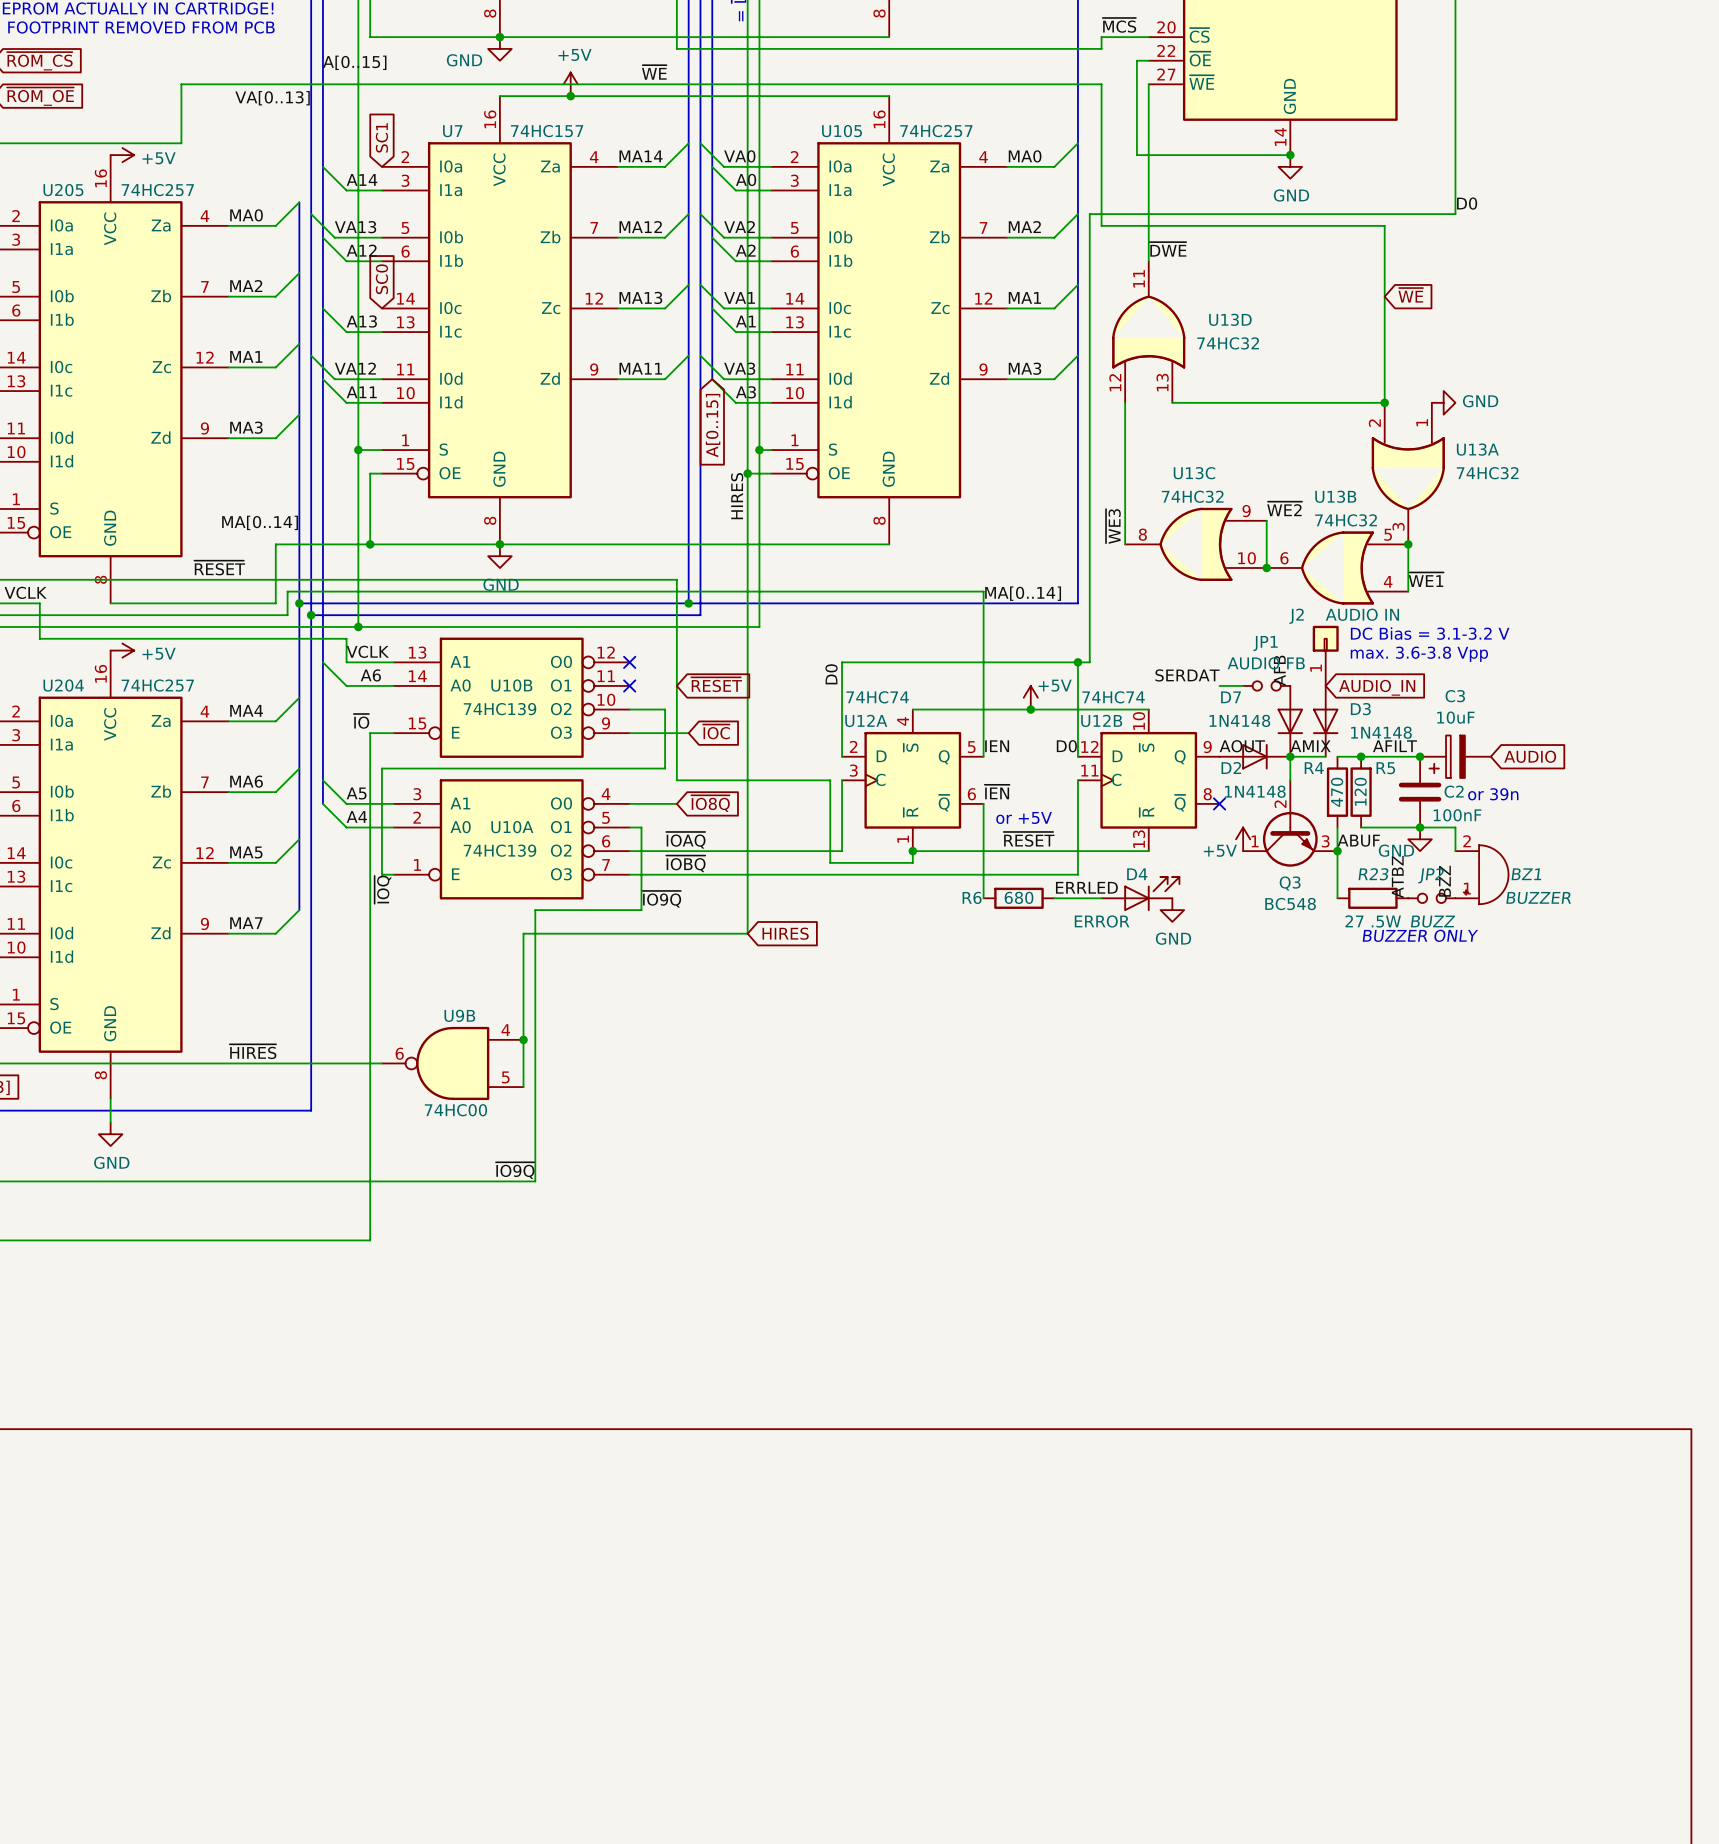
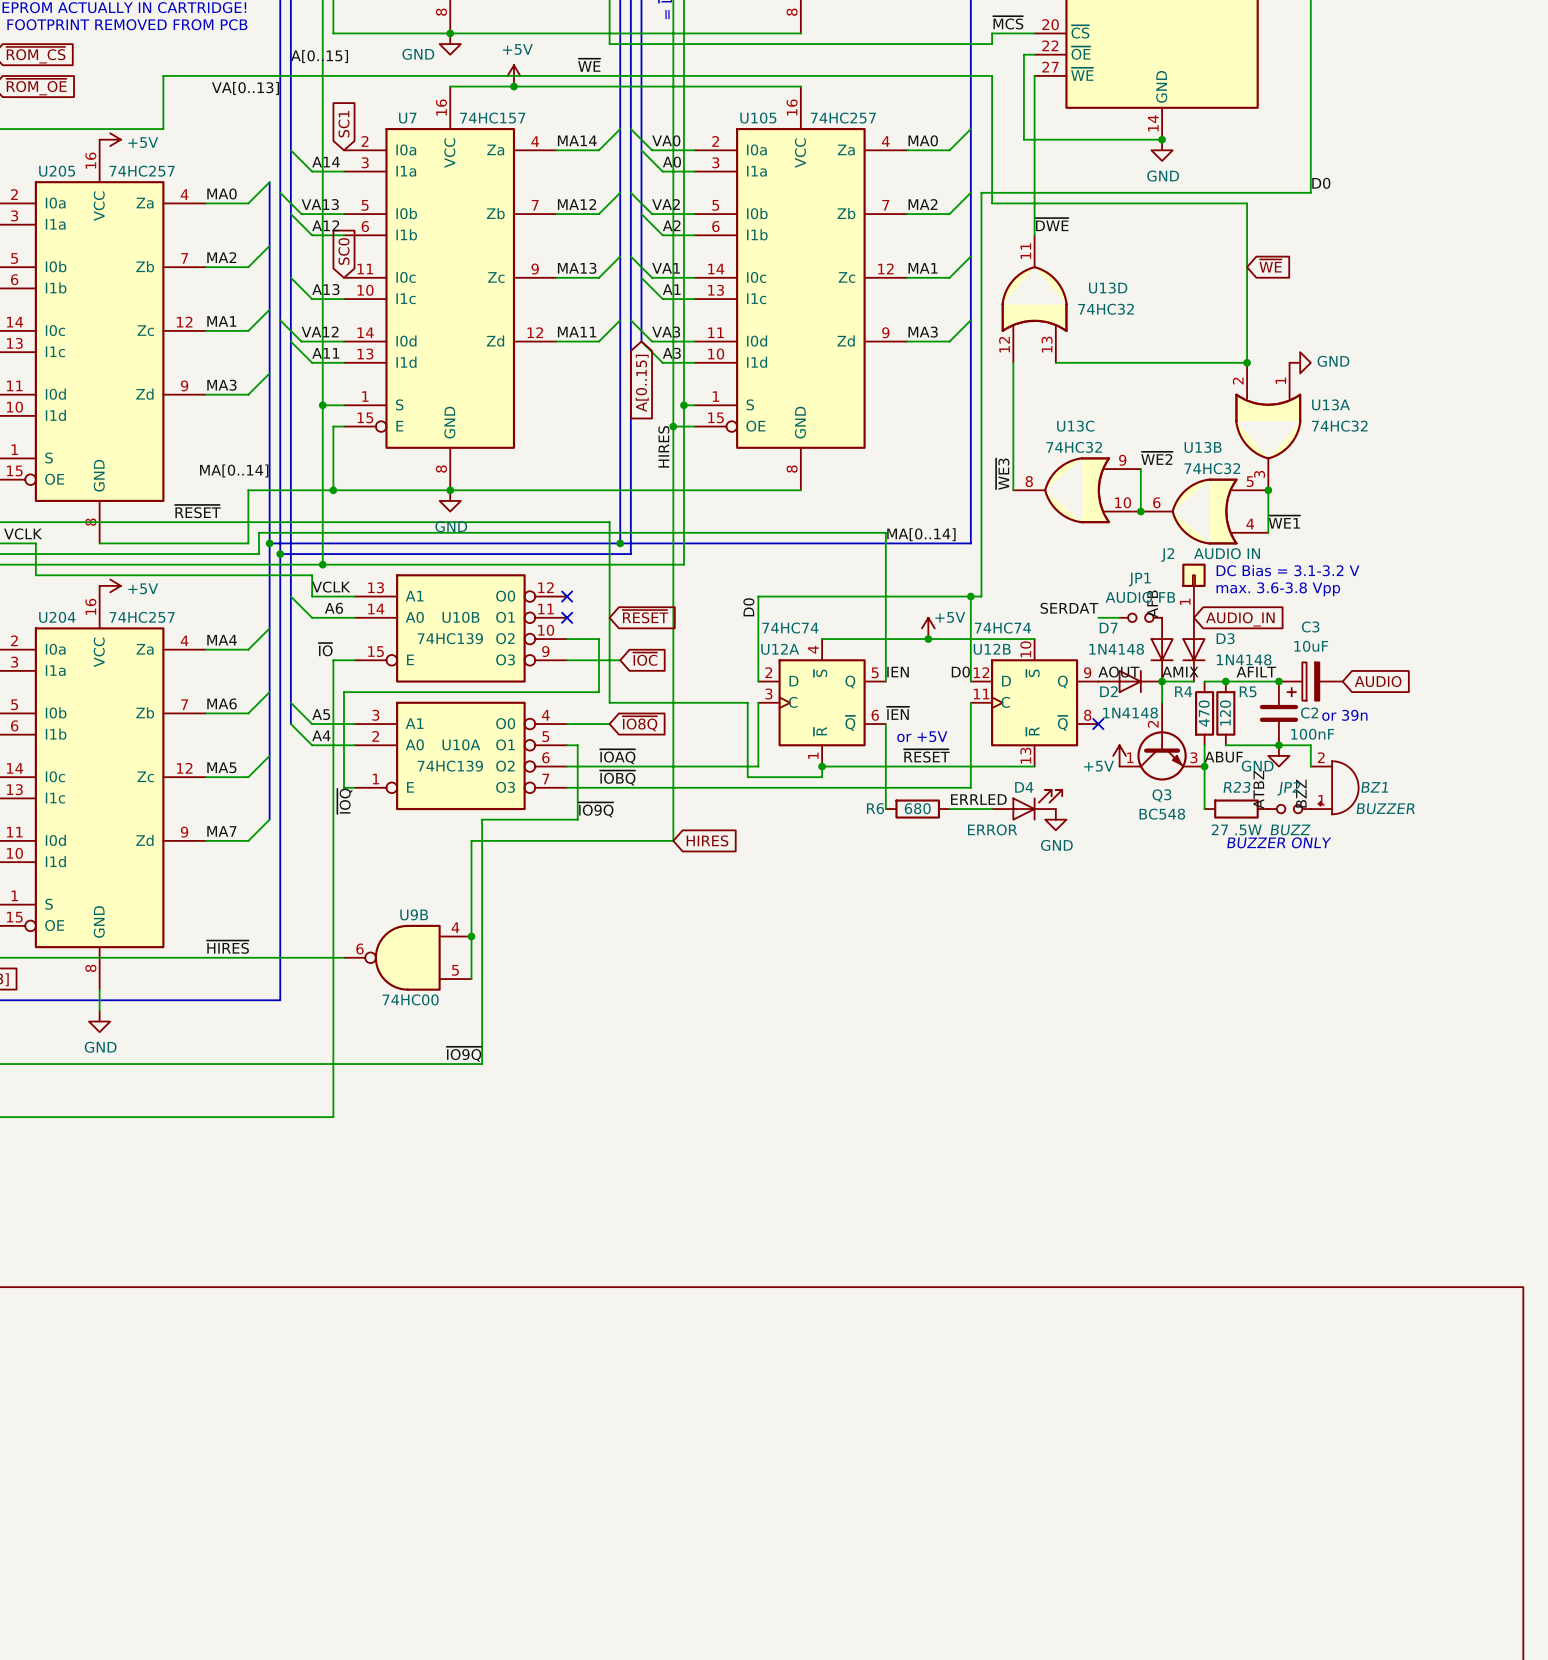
U7 pin number: 14 (405, 298) -> 11 (365, 269)
U7 pin number: 12 (594, 298) -> 9 (535, 269)
U7 pin number: 13 (405, 322) -> 10 (365, 290)
U7 pin number: 11 (405, 369) -> 14 (365, 332)
U7 pin number: 9 (594, 369) -> 12 (535, 332)
U7 pin number: 10 (405, 393) -> 13 (365, 354)
U7 pin name: OE (449, 473) -> E (399, 426)

